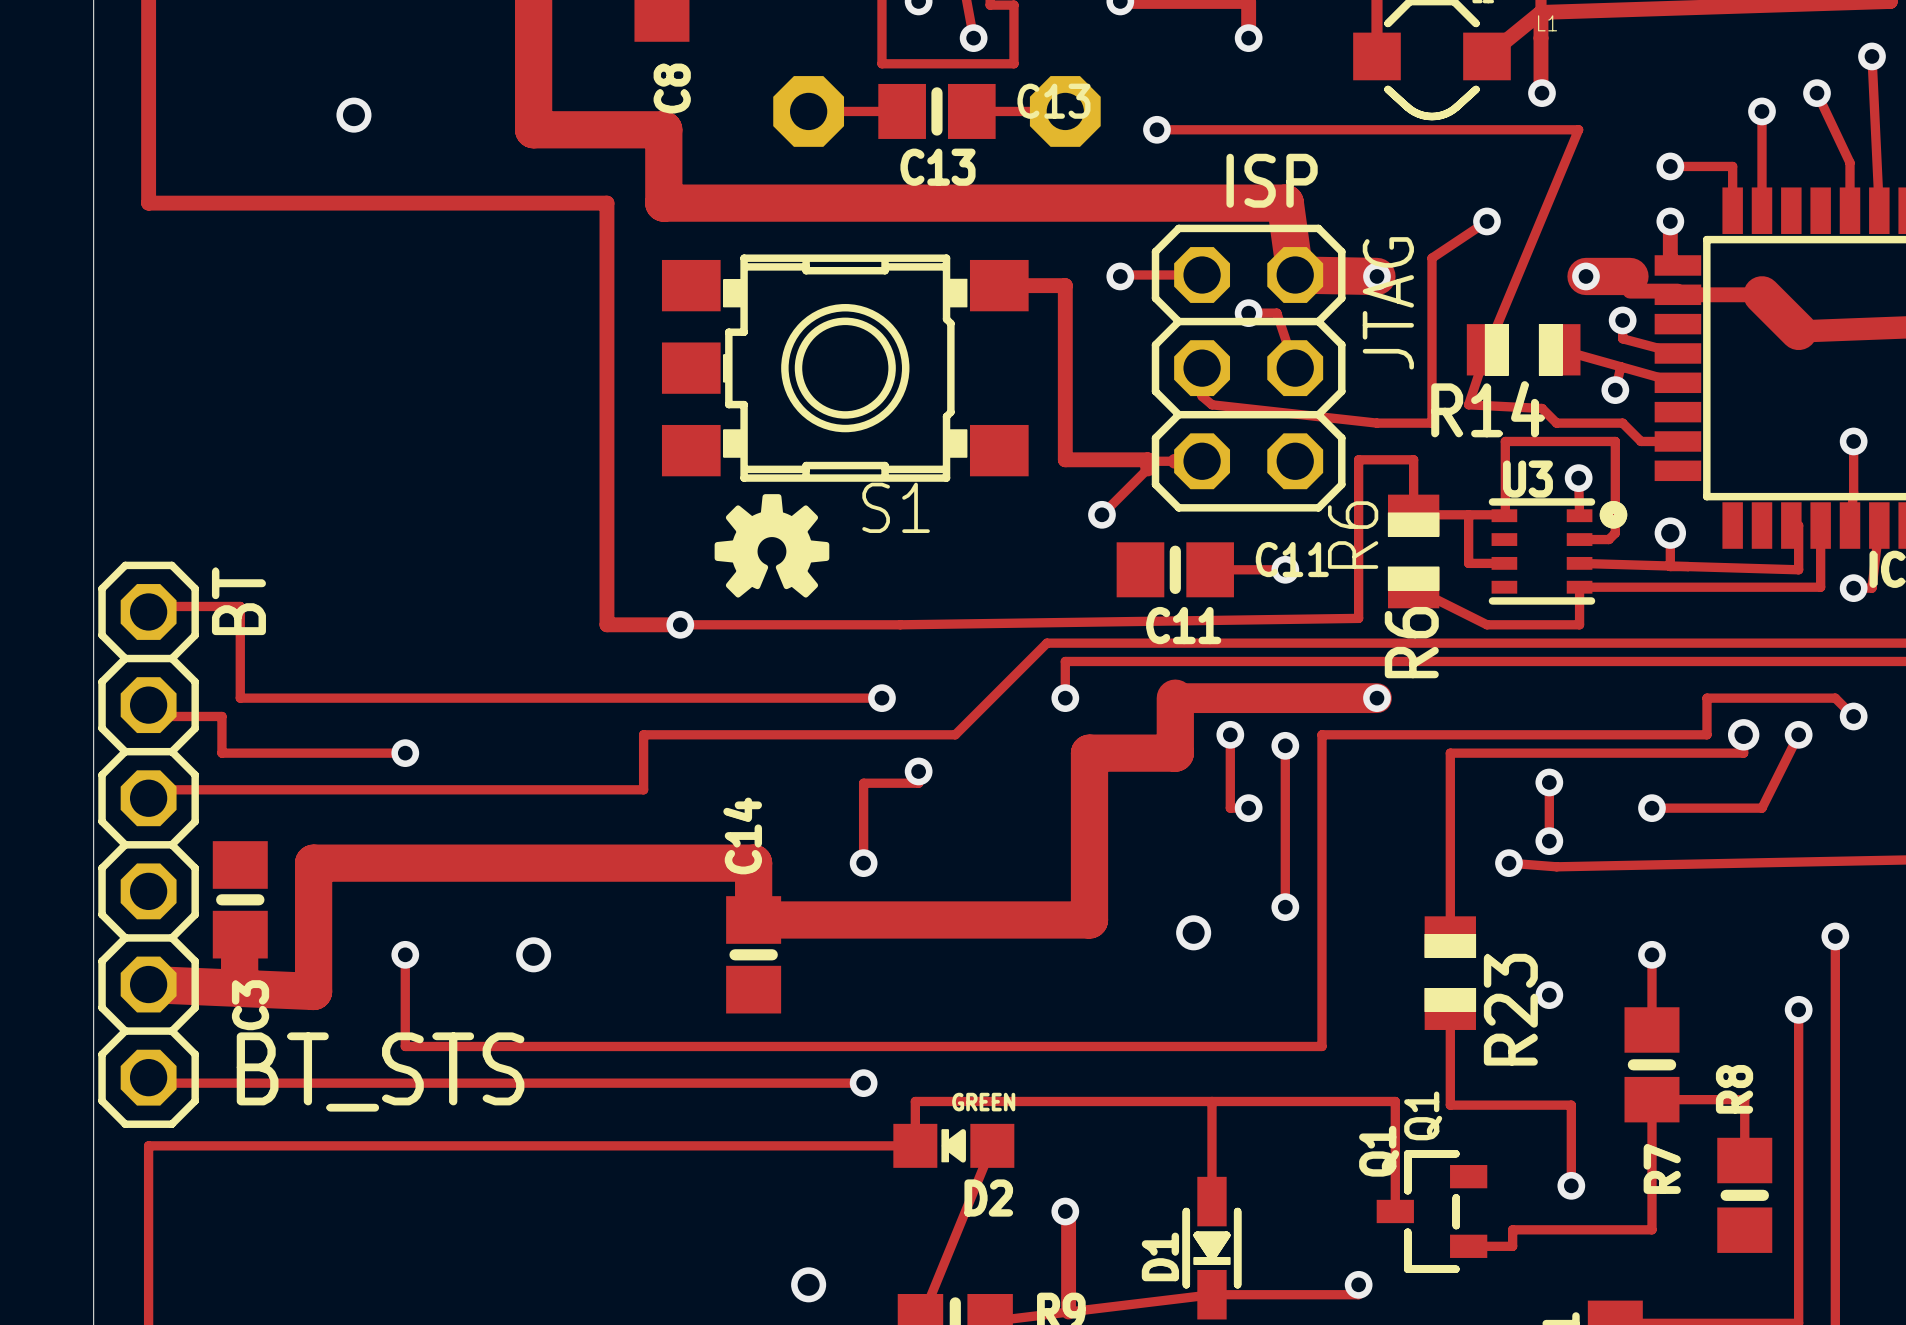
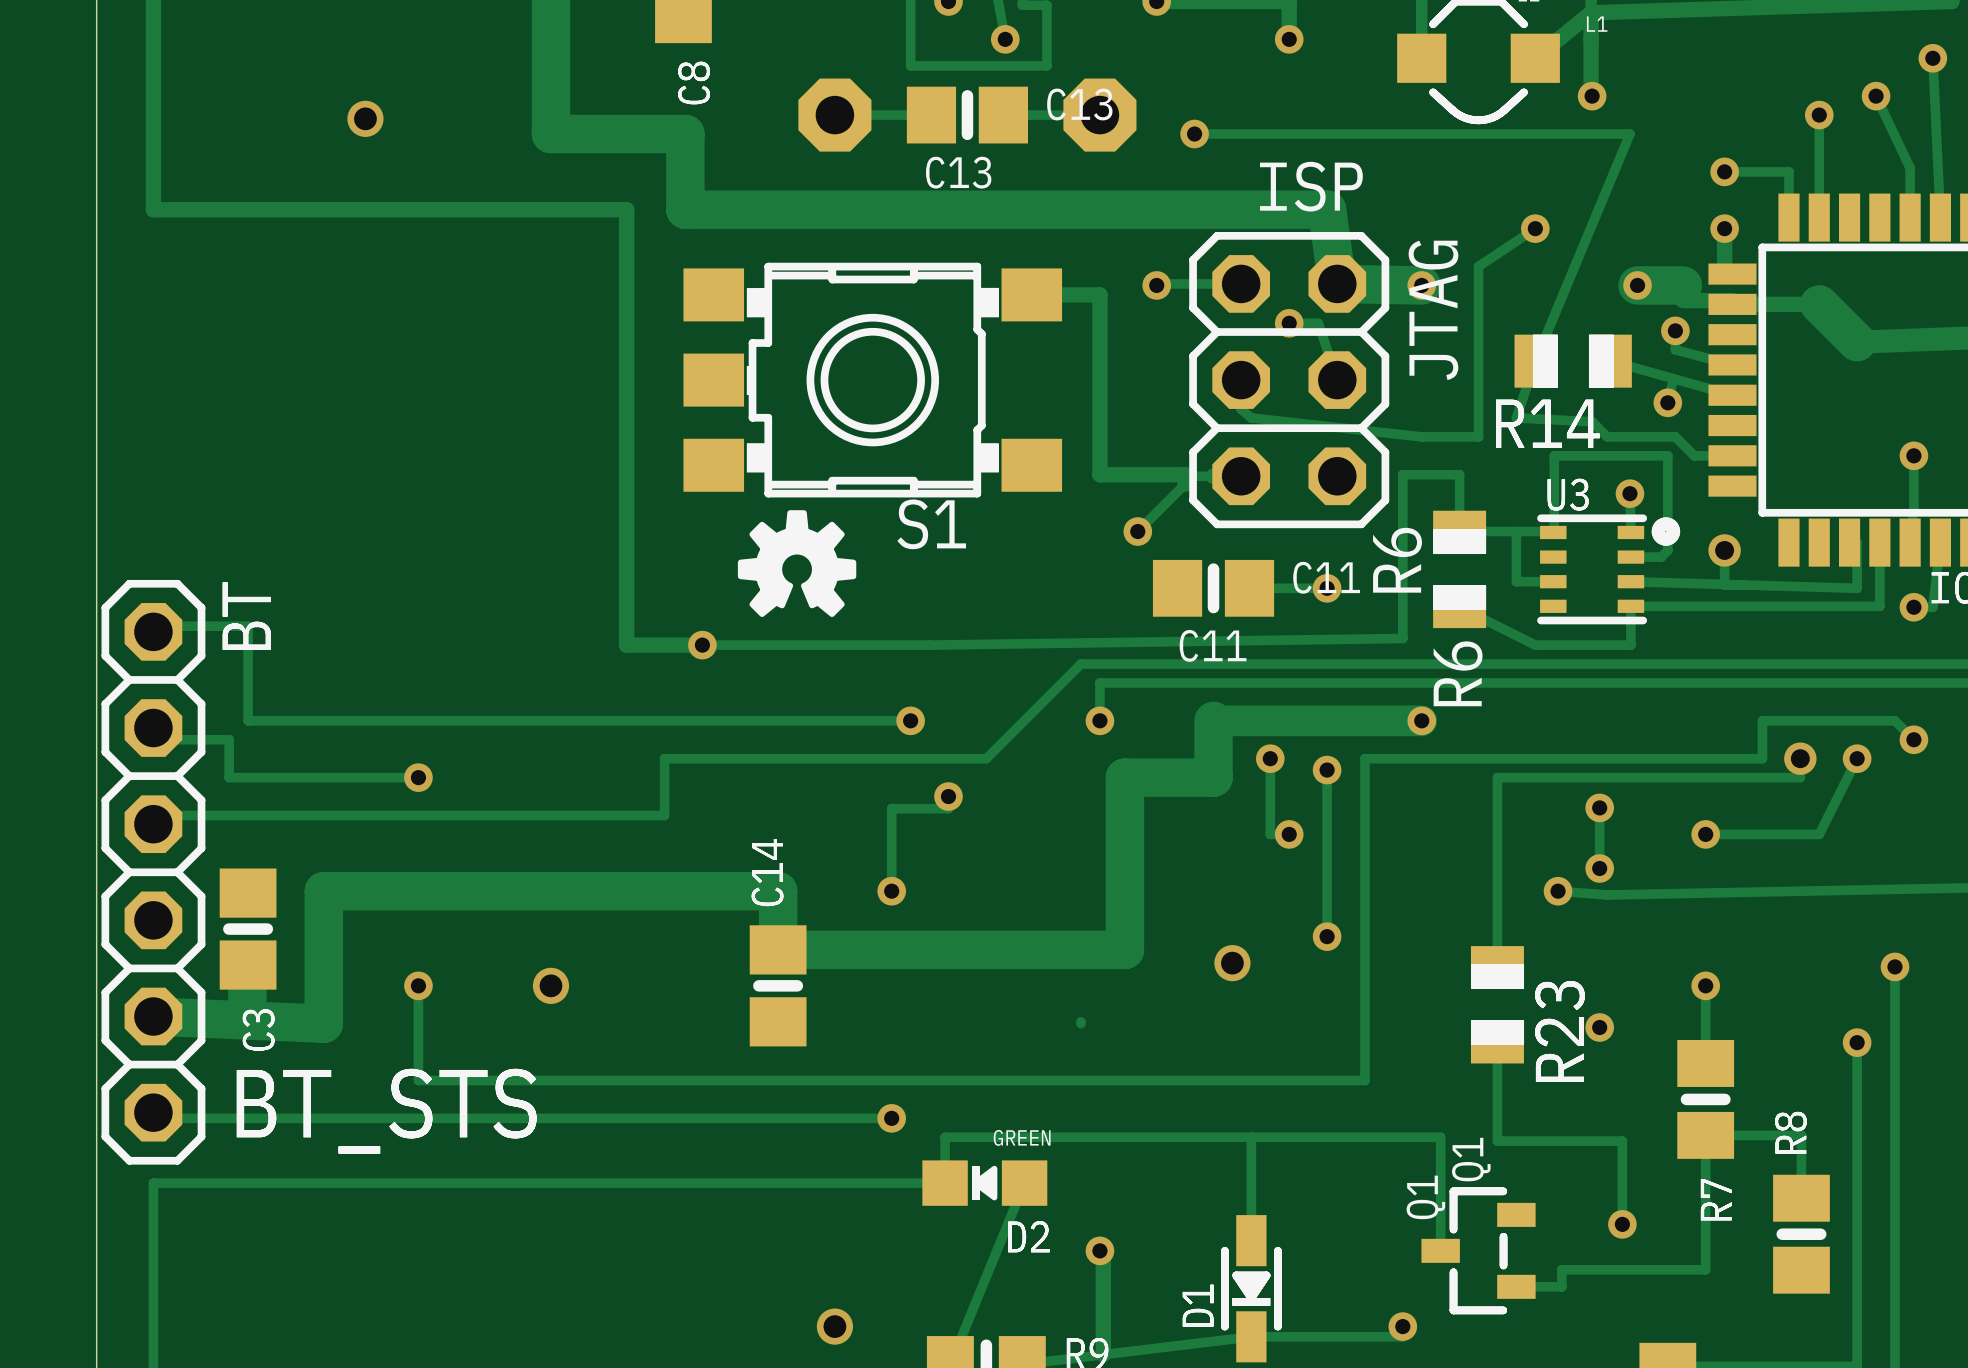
track: none -> (1081, 1021) (1081, 1023)

